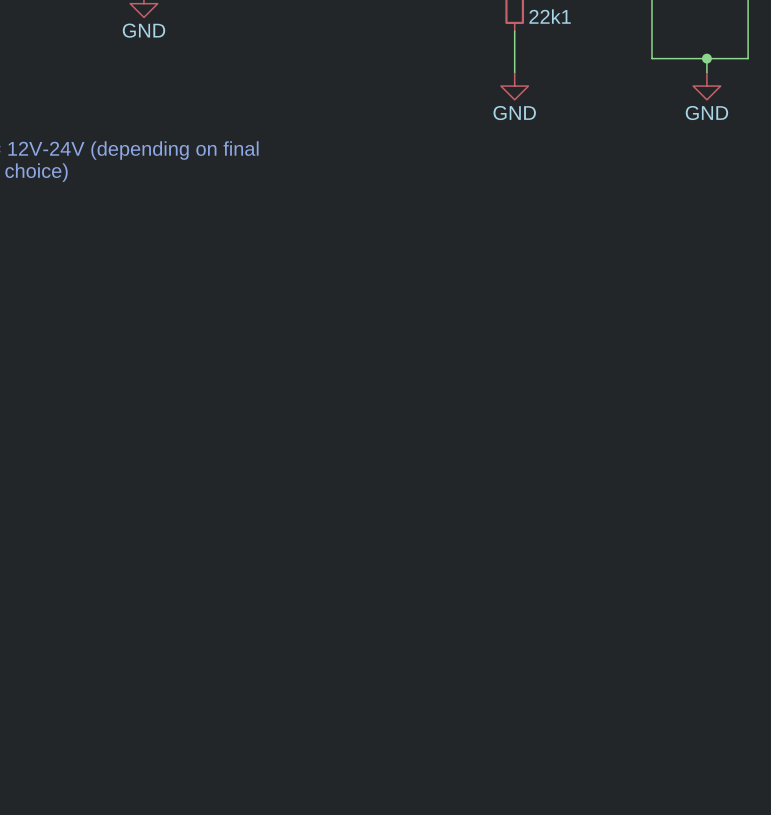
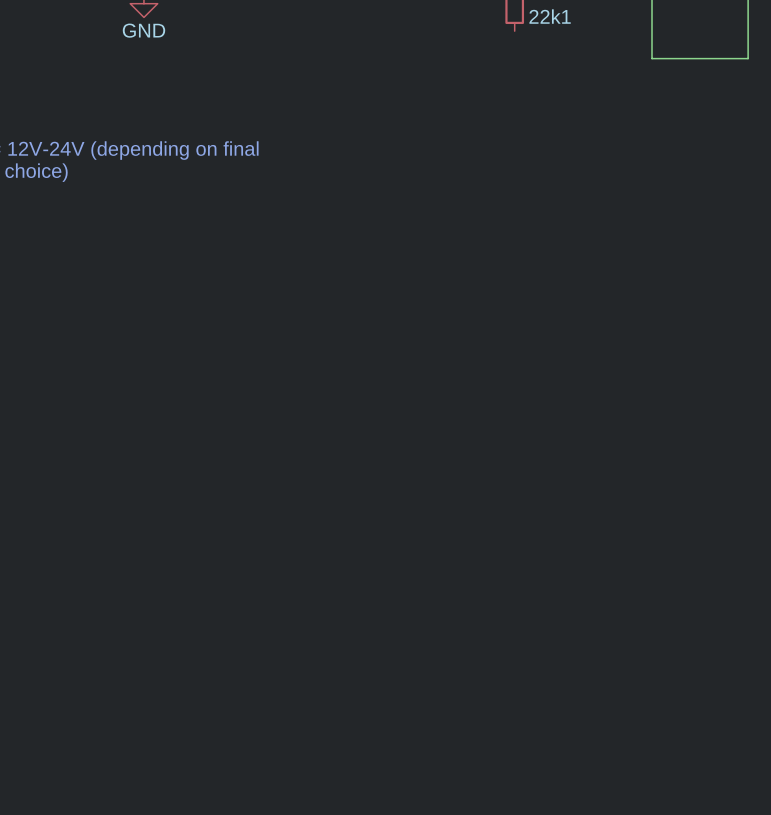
wire: (514, 31) (514, 72) -> none
wire: (706, 58) (706, 72) -> none
junction: (706, 58) -> none
power symbol: GND (514, 86) -> none
power symbol: GND (706, 86) -> none

